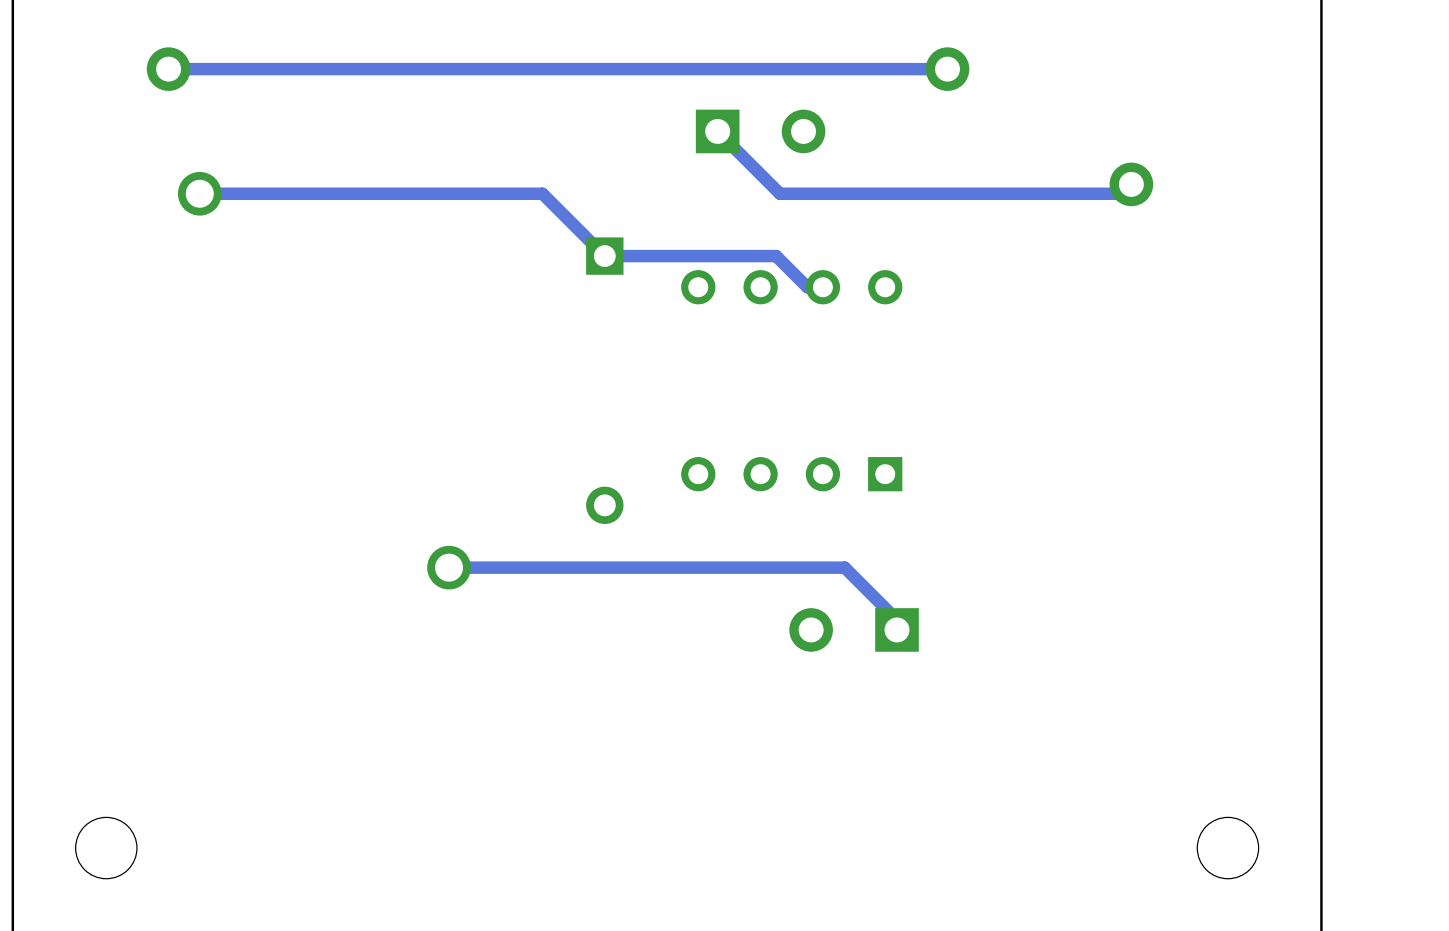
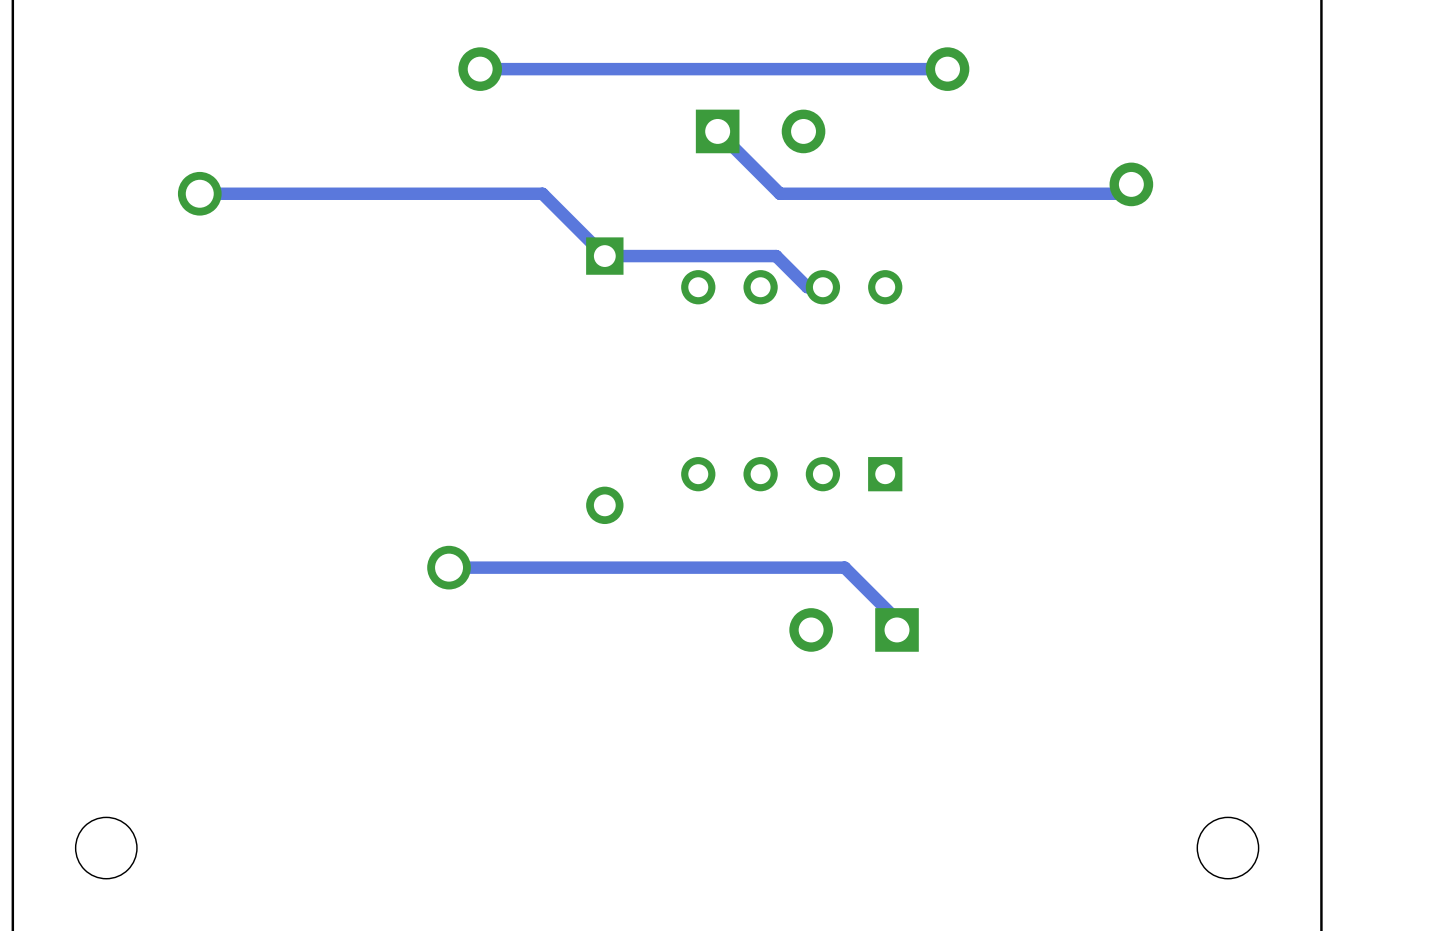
via: (168, 69) -> none
track: (480, 69) (168, 69) -> none
via: none -> (480, 69)

